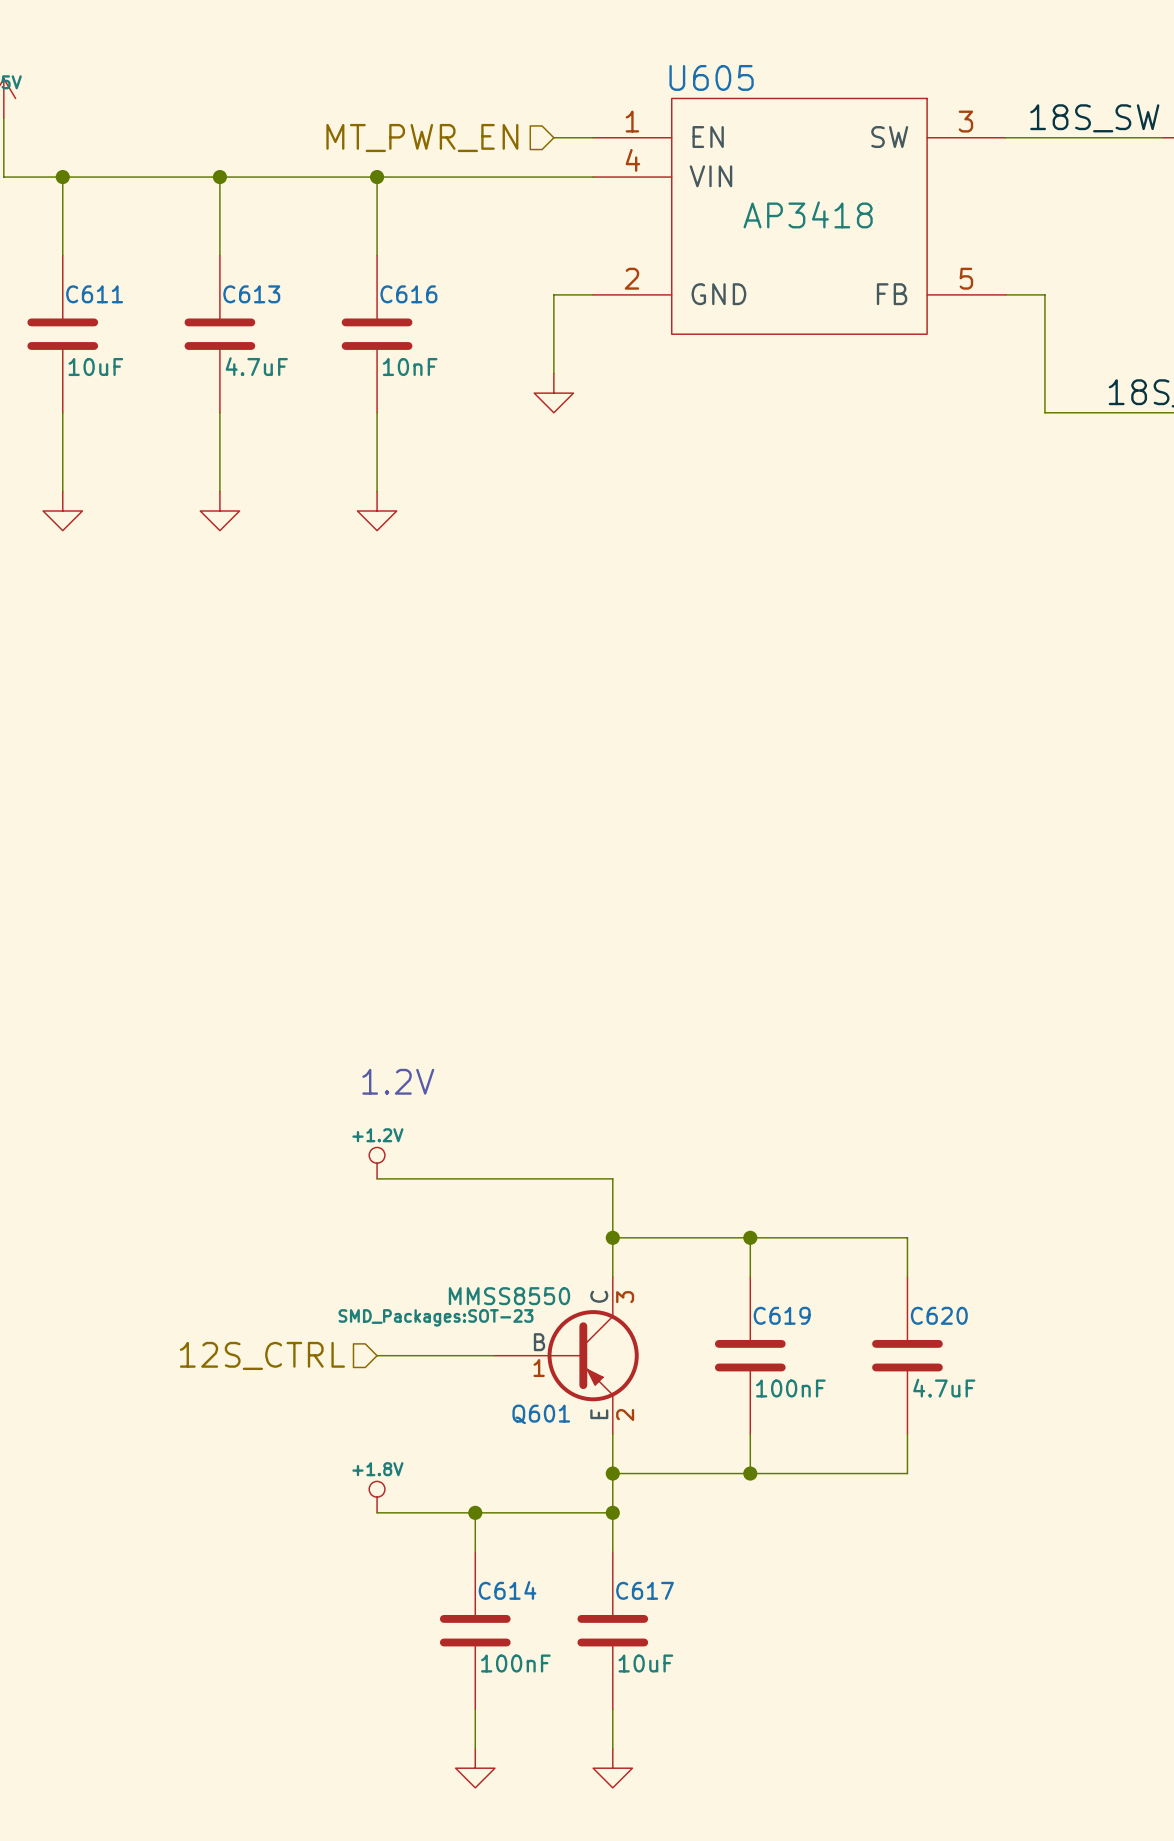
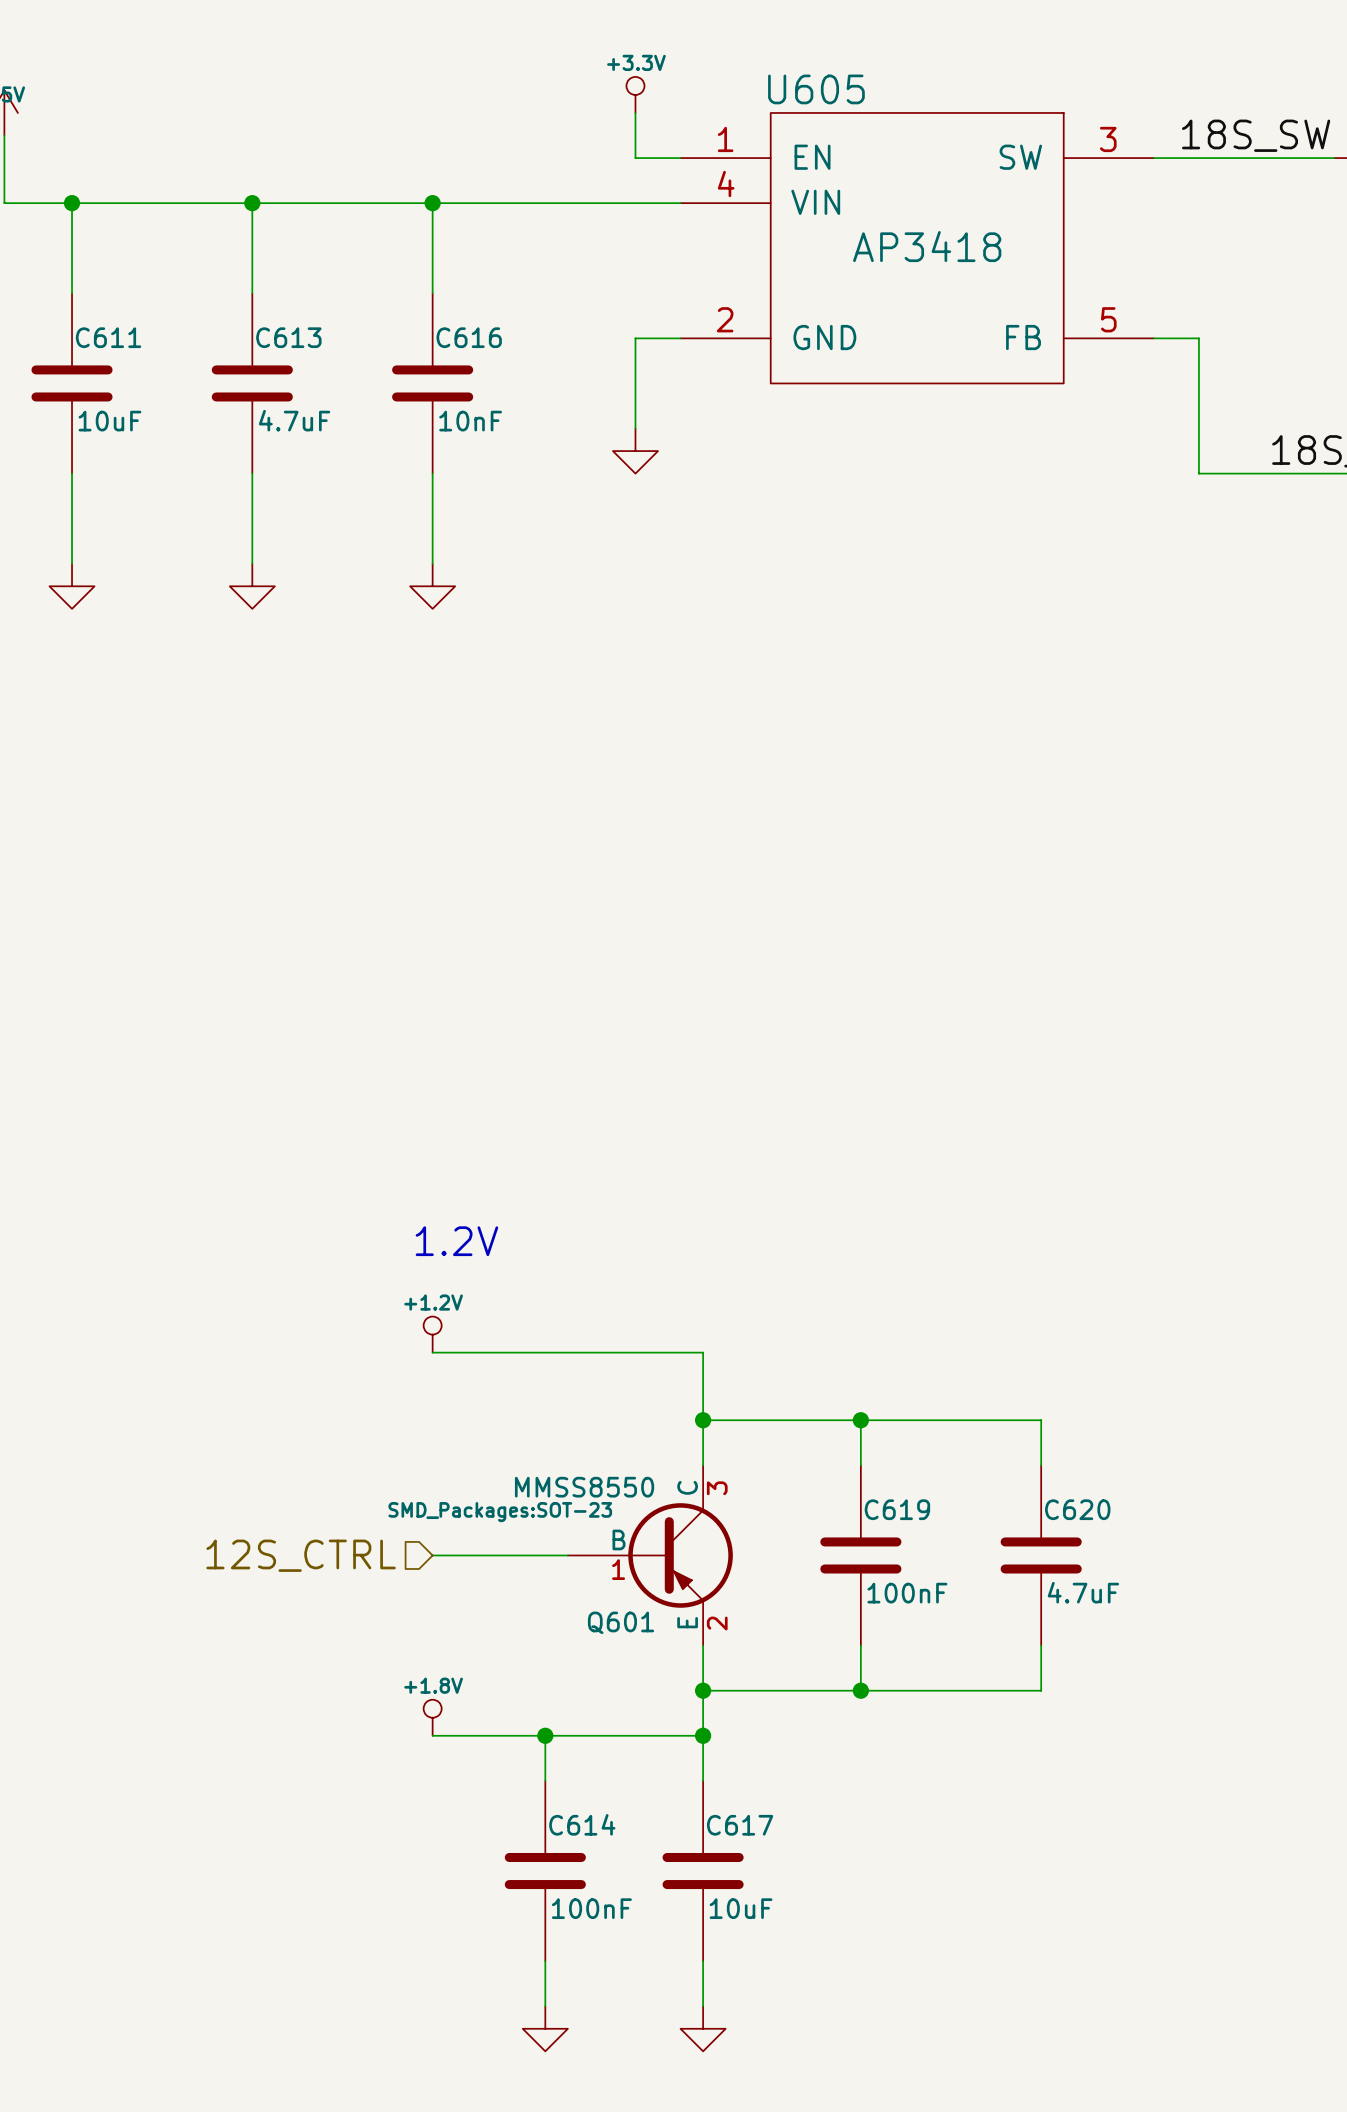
power symbol: none -> +3.3V (635, 94)
wire: none -> (635, 112) (635, 158)
hierarchical label: MT_PWR_EN (422, 138) -> none

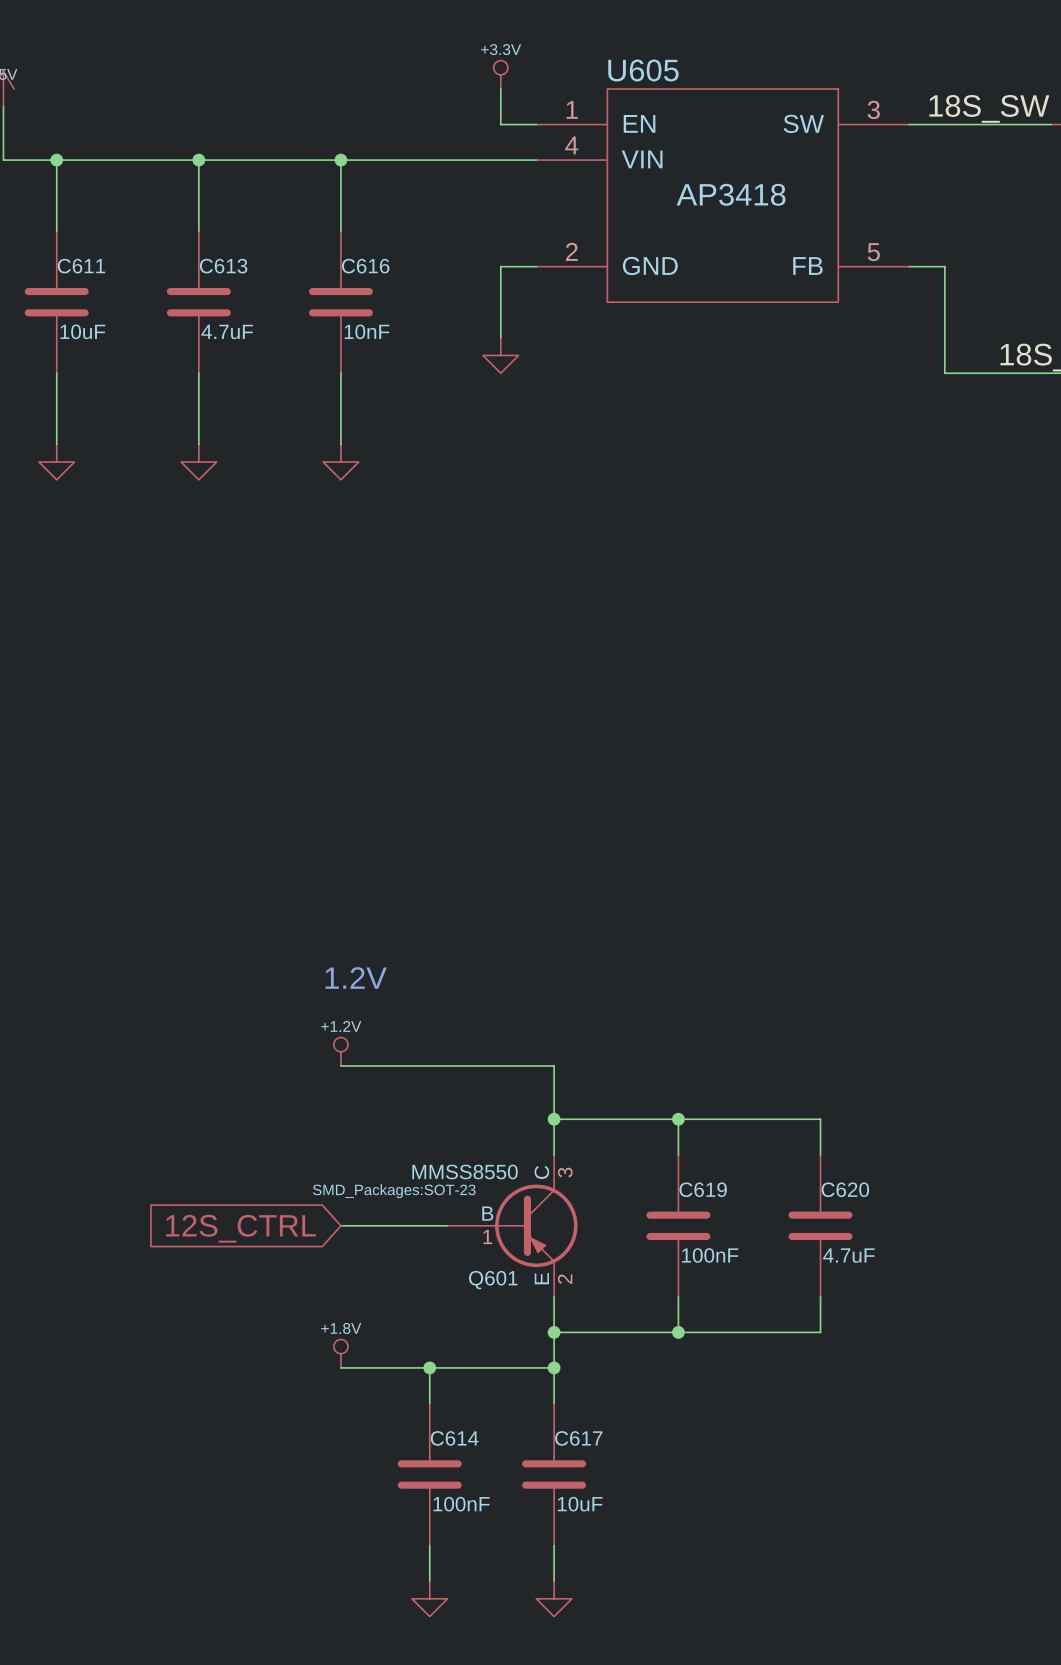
hierarchical label: 12S_CTRL (301, 1555) -> none
global label: none -> 12S_CTRL (241, 1228)

